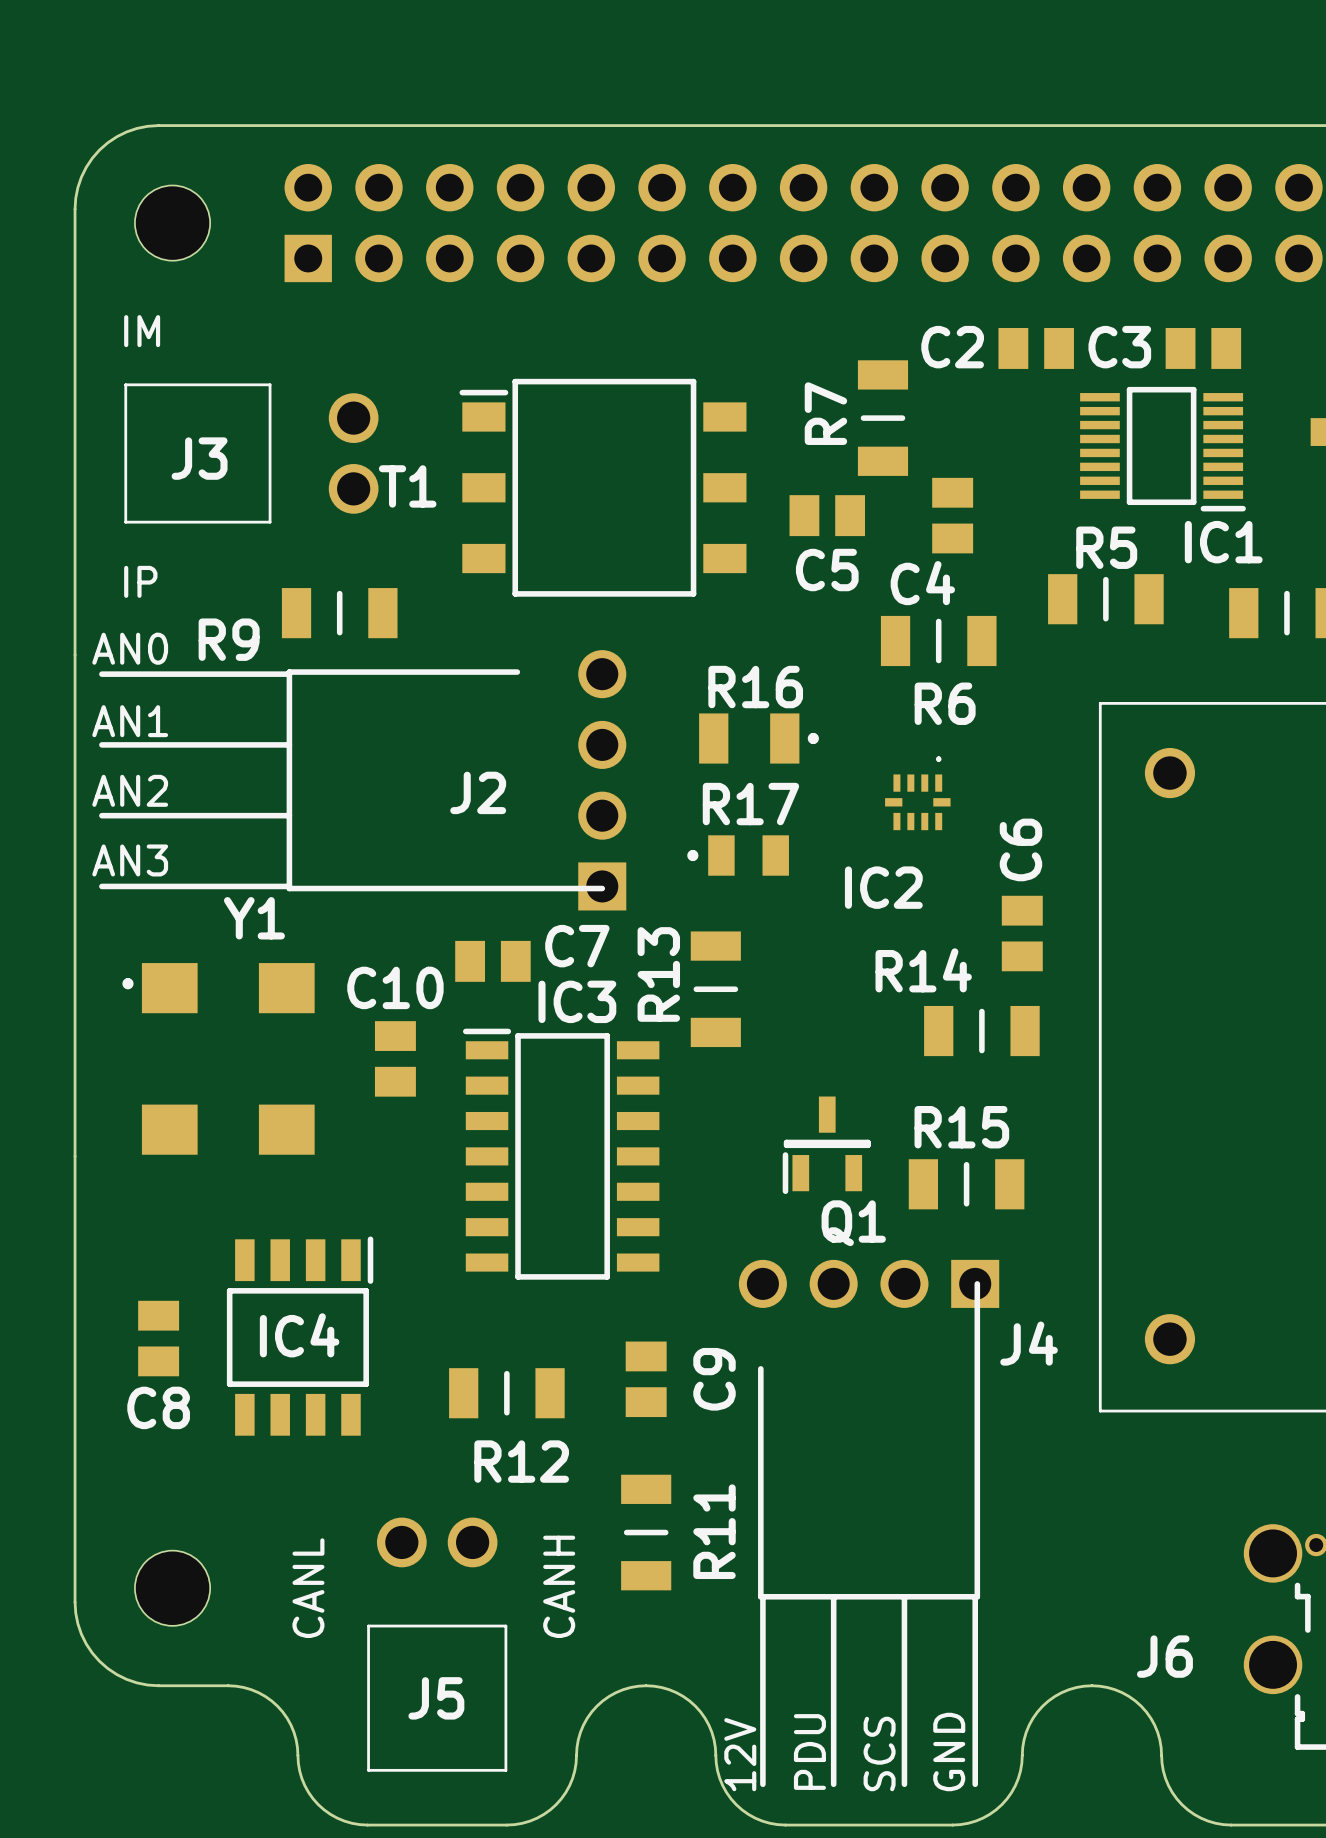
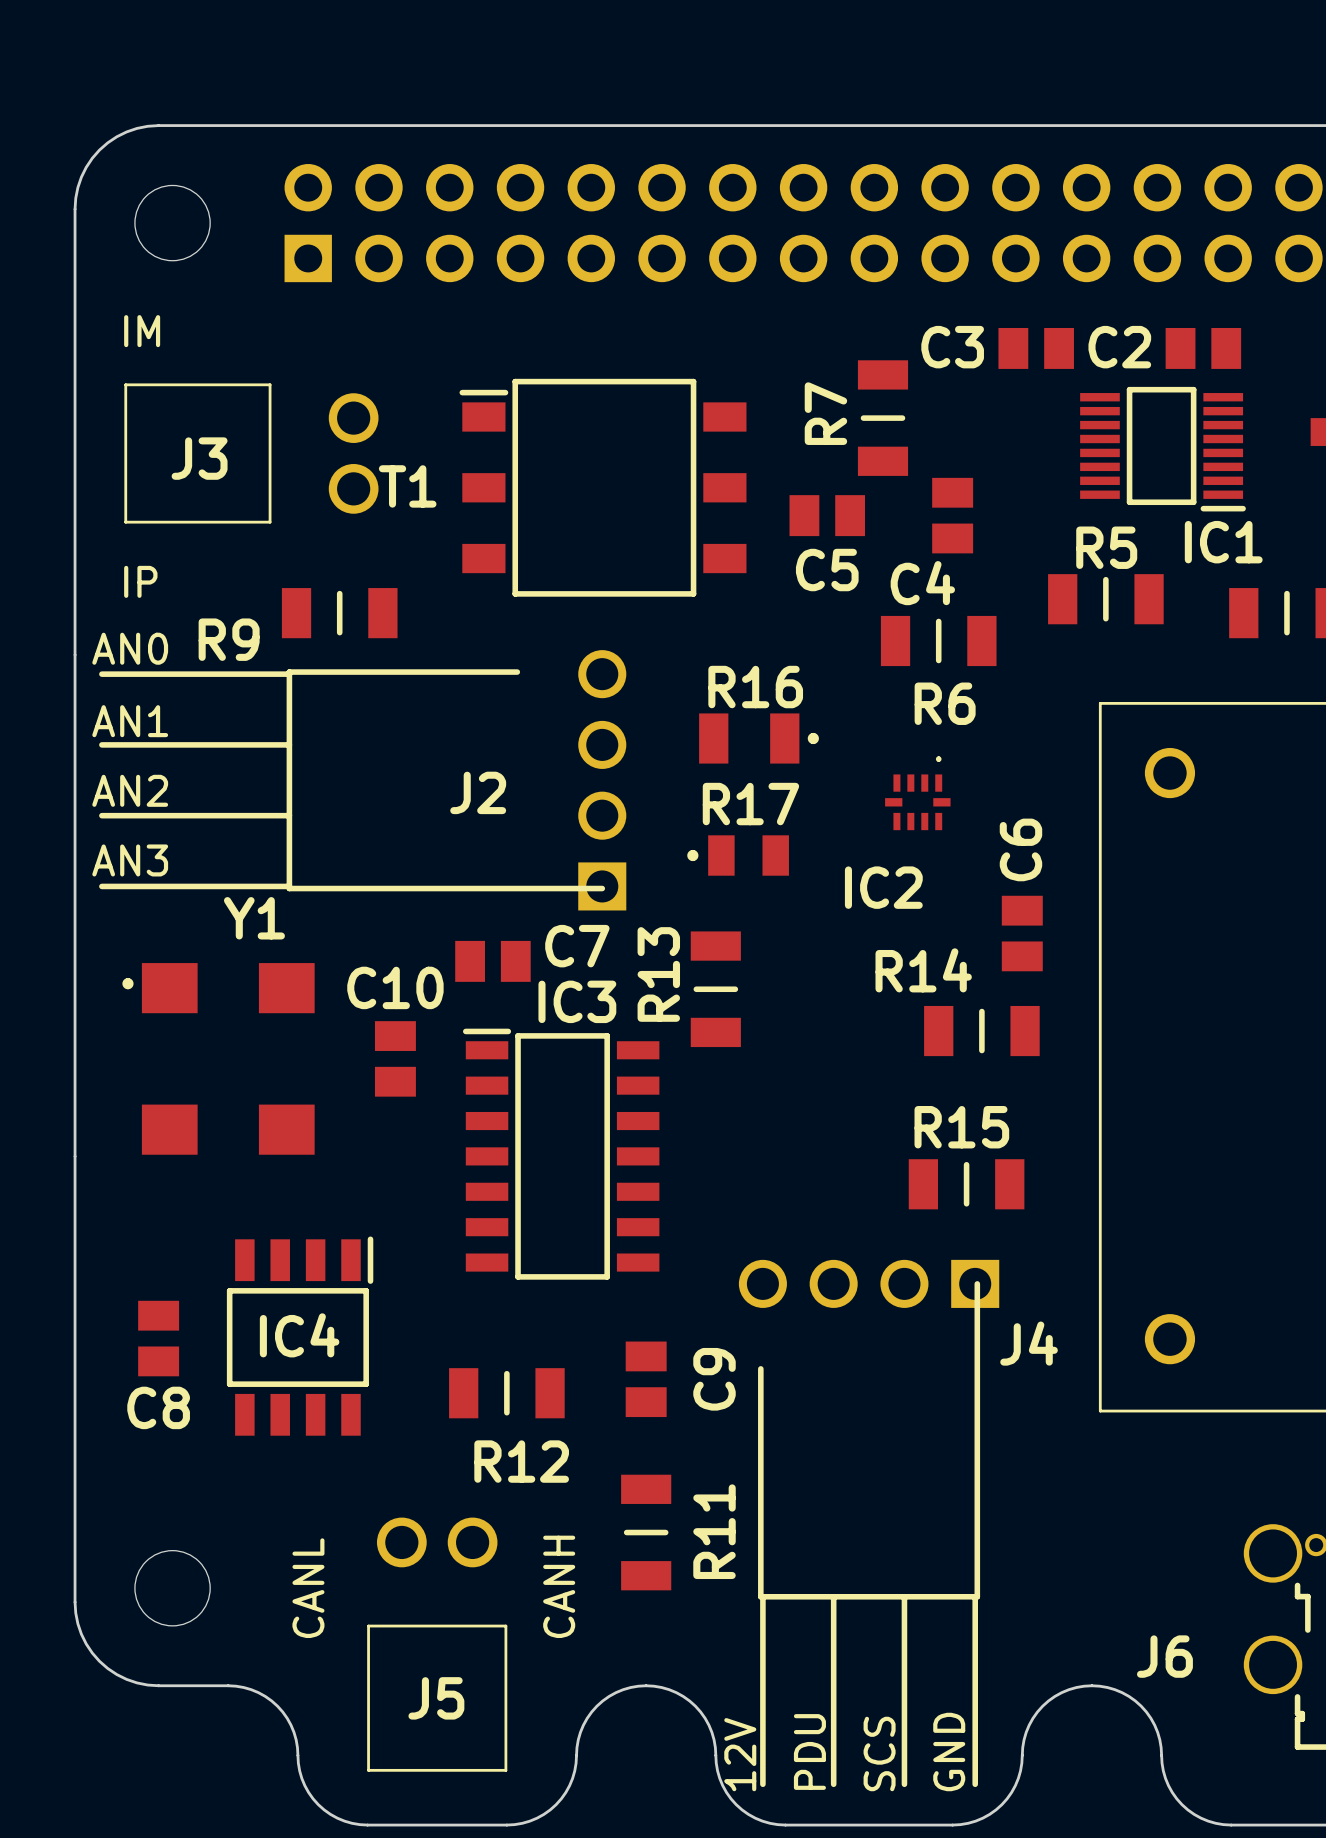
C2 name position: C2 (952, 347) -> C2 (1119, 347)
C3 name position: C3 (1119, 347) -> C3 (952, 347)
Q1: (826, 1145) -> none

